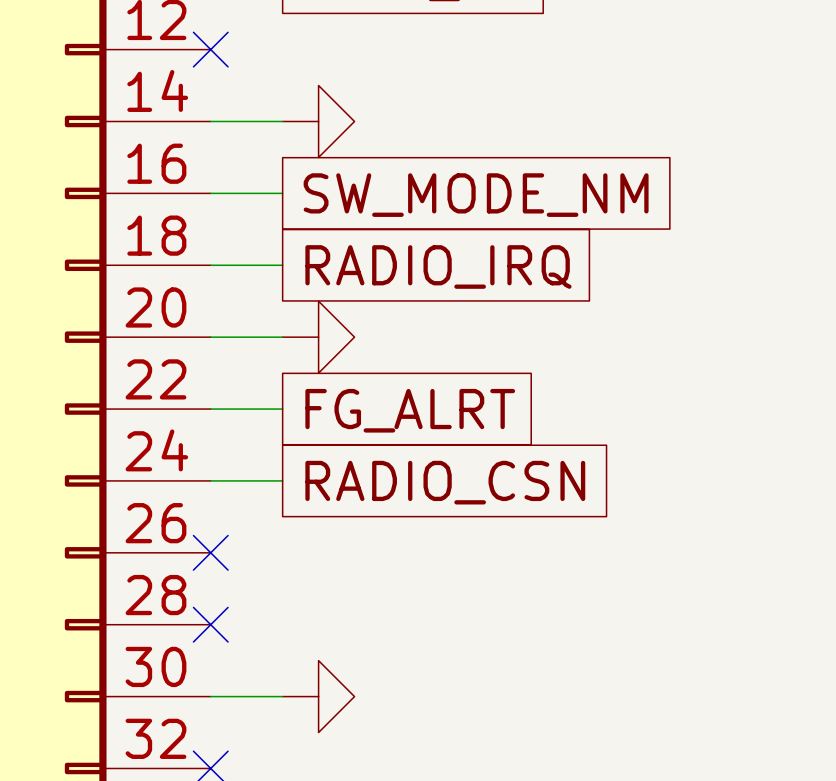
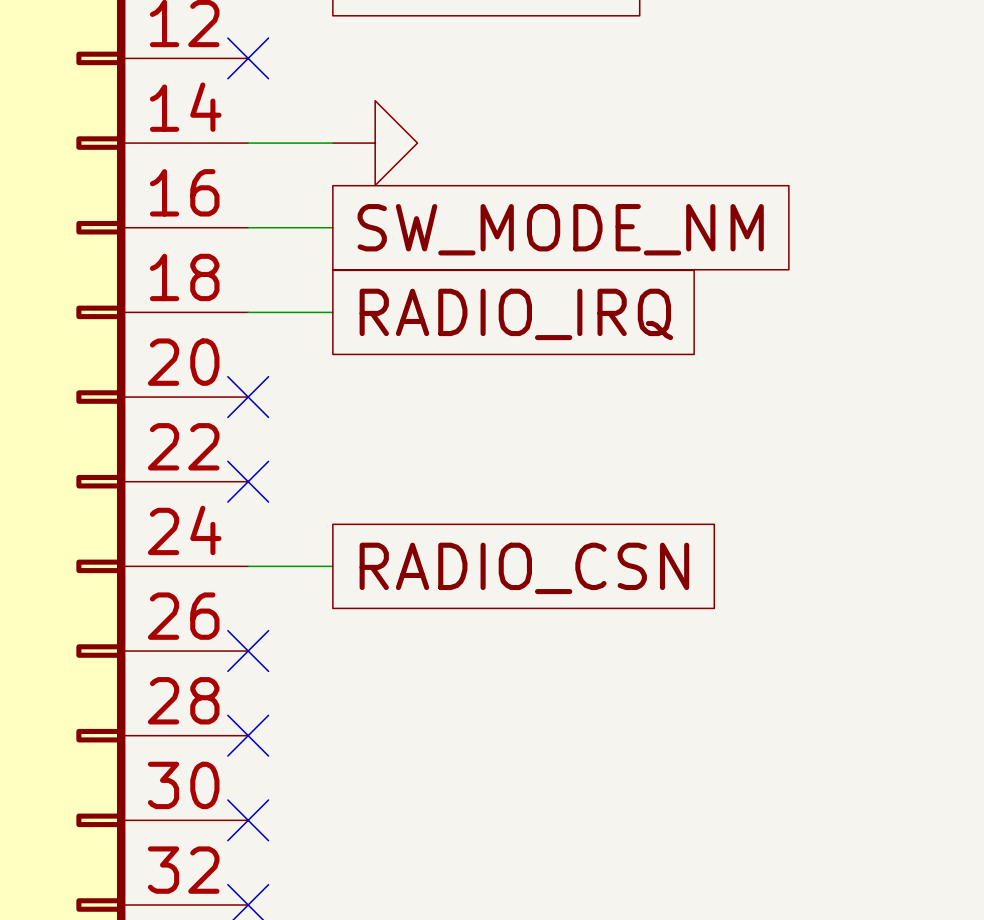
wire: (210, 337) (282, 337) -> none
no-connect mark: none -> (248, 397)
power symbol: (318, 337) -> none
wire: (210, 409) (282, 409) -> none
no-connect mark: none -> (248, 481)
global label: FG_ALRT (410, 410) -> none
wire: (210, 696) (282, 696) -> none
no-connect mark: none -> (248, 820)
power symbol: (318, 696) -> none

